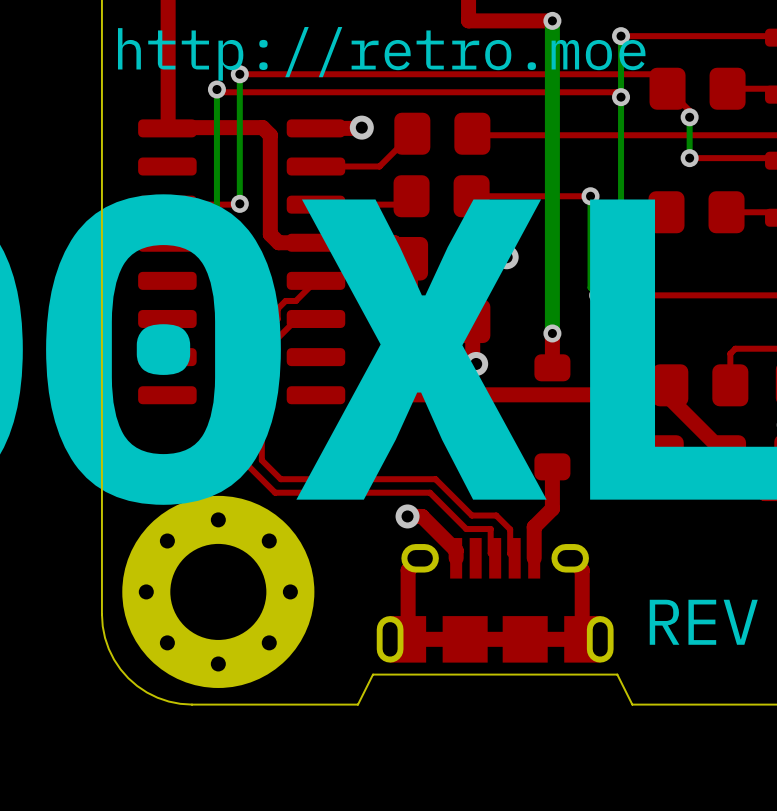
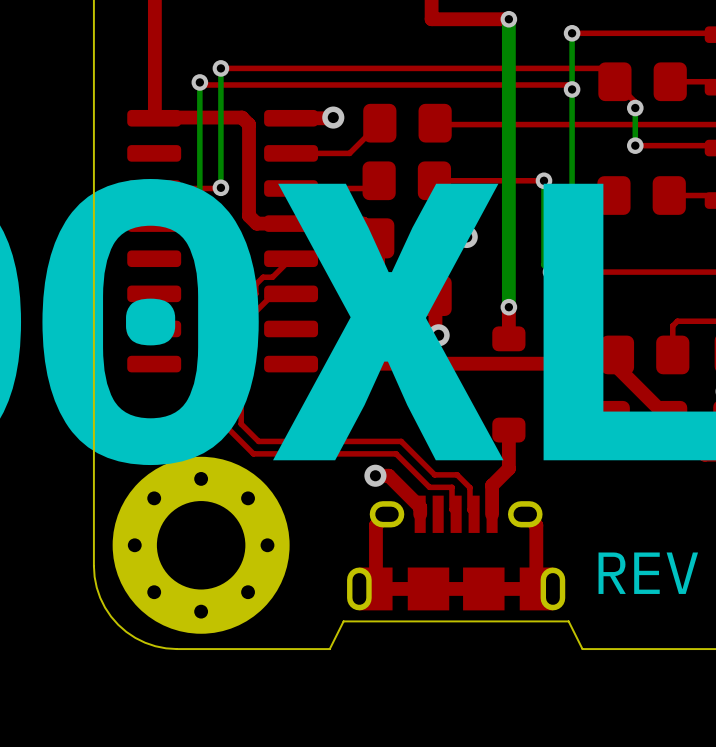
text: http://retro.moe (381, 53) -> none

